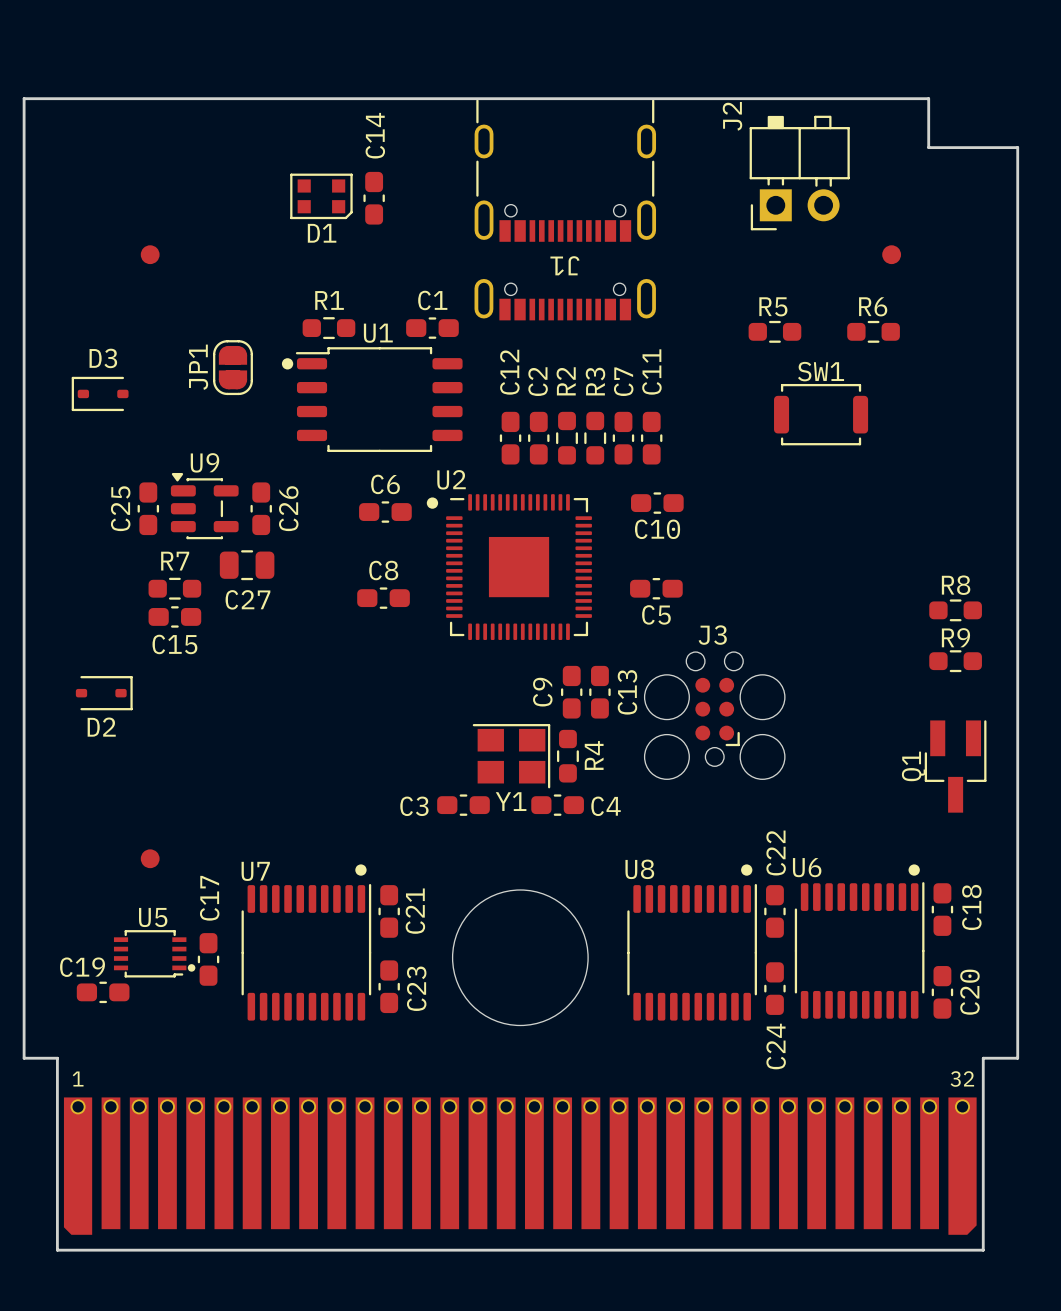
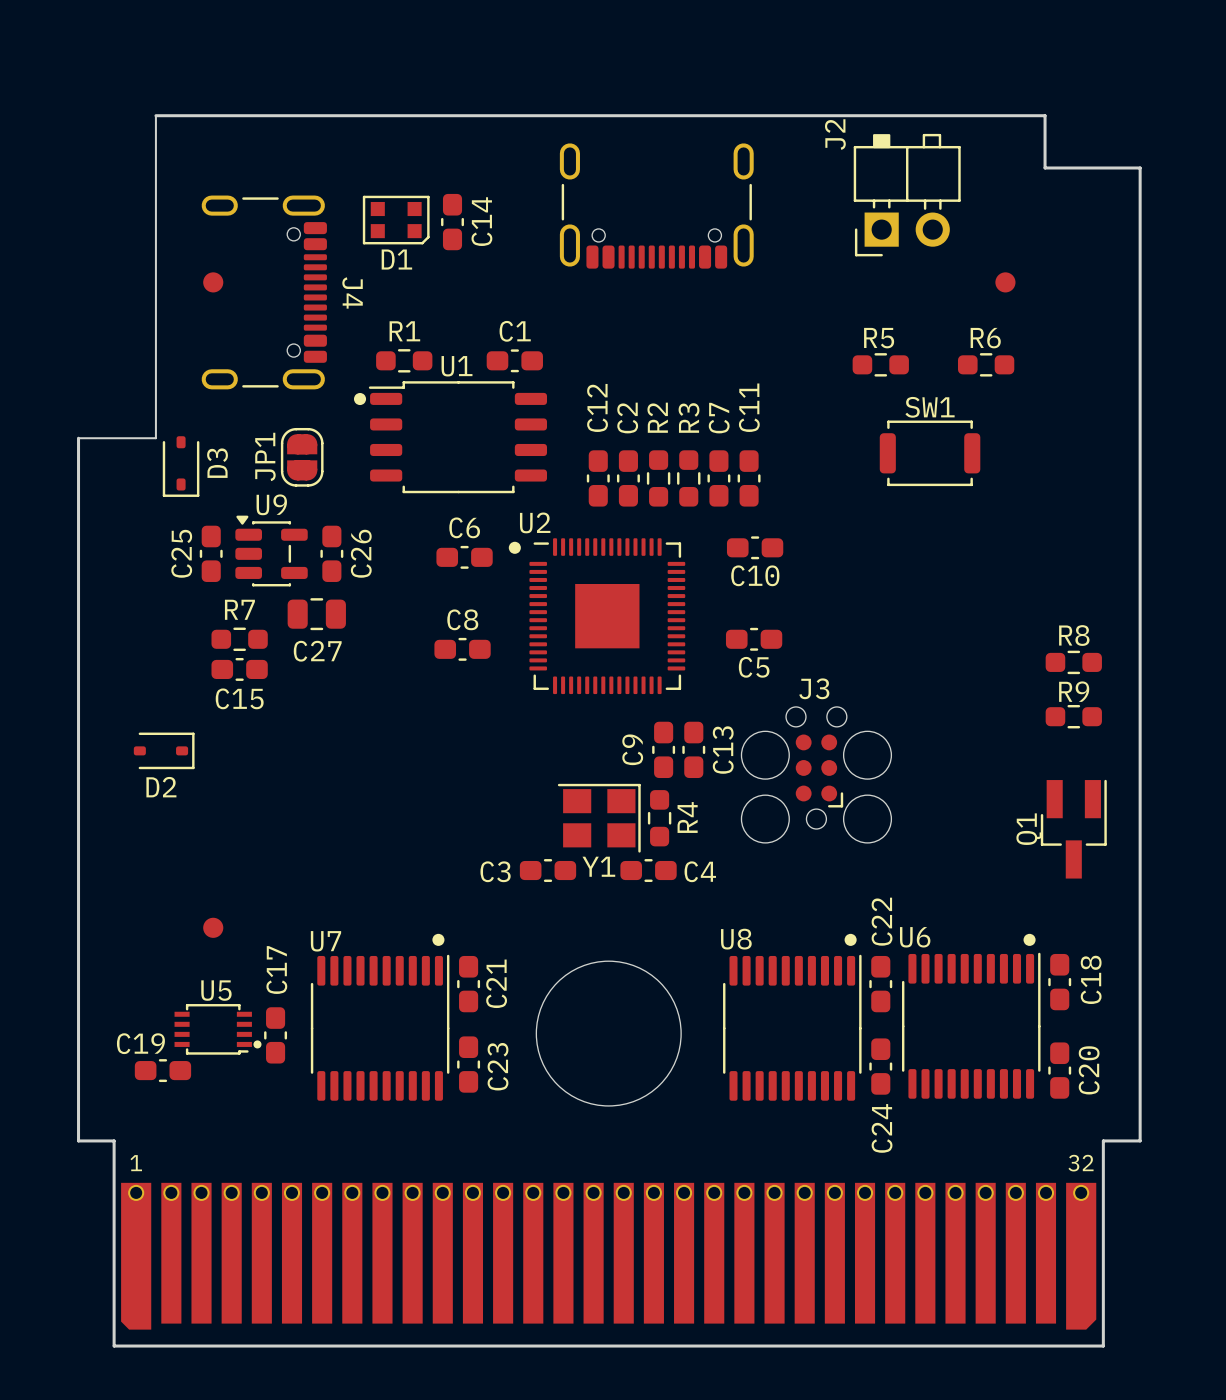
board edge: (96, 98) (24, 98) (24, 400) -> (155, 115) (155, 438) (78, 438)
C14 name position: C14 (375, 135) -> C14 (481, 221)
part: none -> (656, 205)
J1: (565, 209) -> none
J4: none -> (264, 292)
D3 name position: D3 (103, 358) -> D3 (217, 463)
JP1 position: (232, 367) -> (302, 457)
D3 rotation: 0° (100, 393) -> 90° counterclockwise (181, 466)
D3 position: (100, 393) -> (181, 466)

